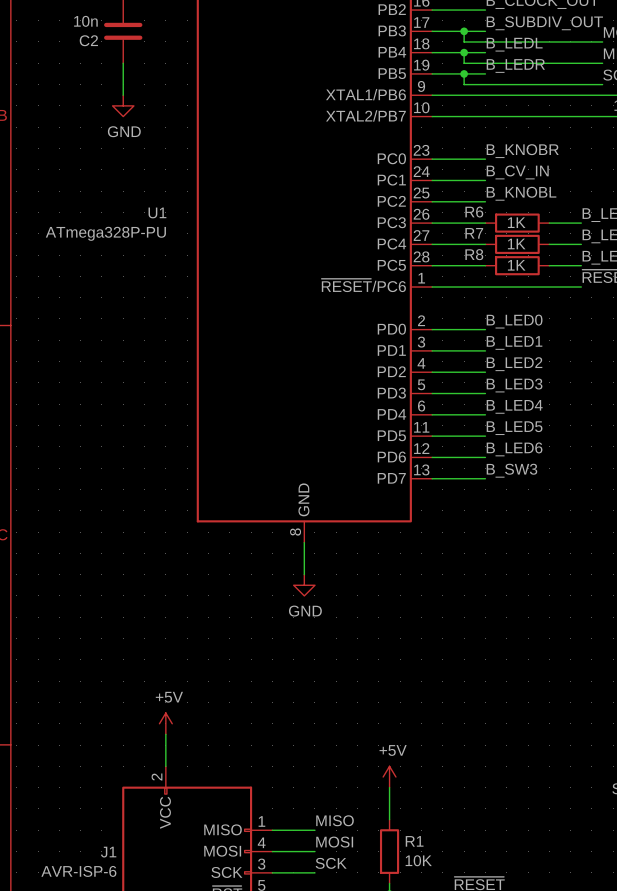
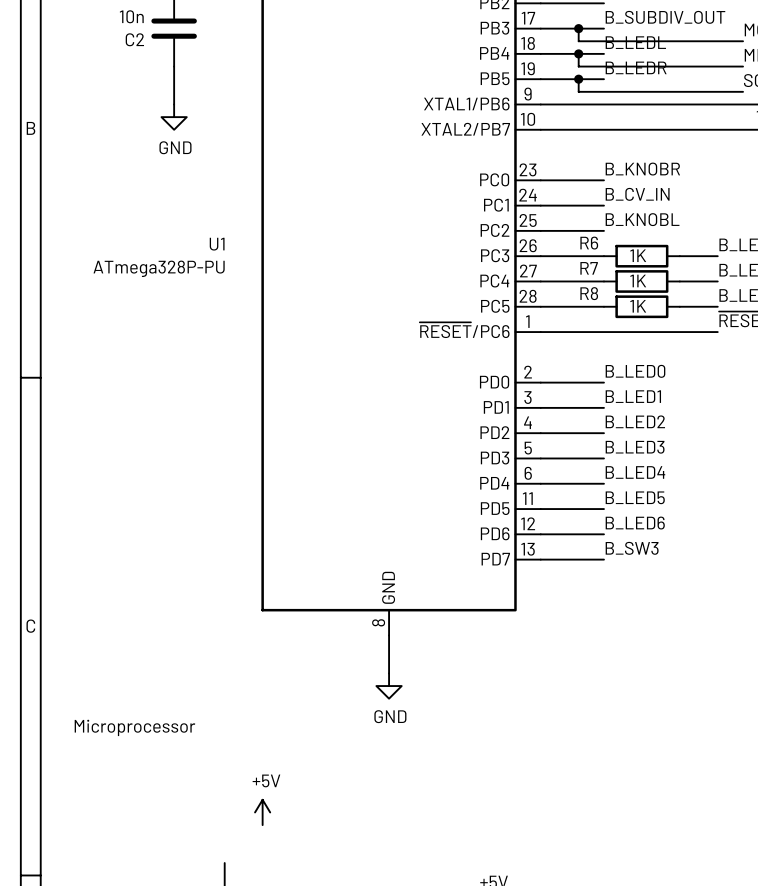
text: none -> Microprocessor (134, 727)
power symbol position: +5V (165, 723) -> +5V (262, 812)

